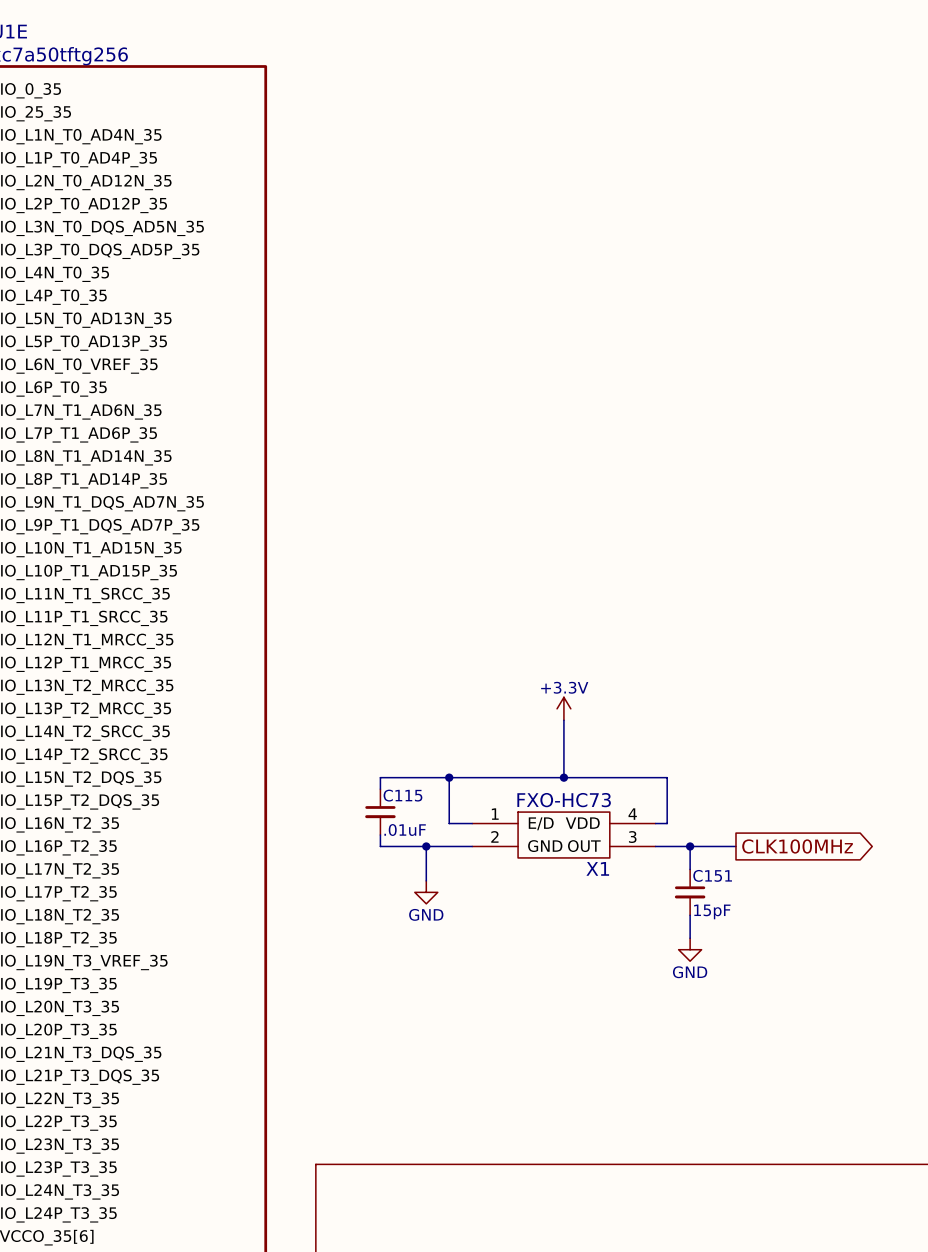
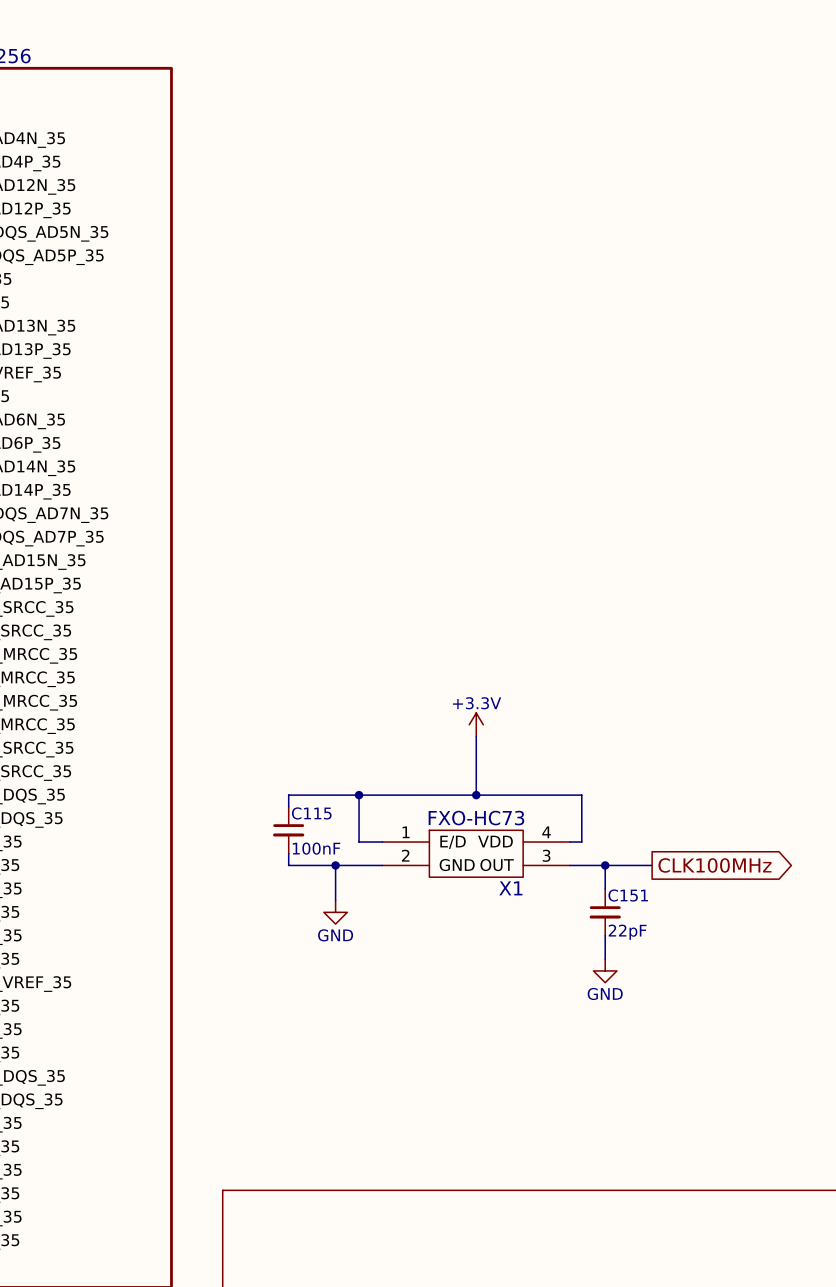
C115 value: .01uF (405, 830) -> 100nF (316, 848)
C151 value: 15pF (712, 911) -> 22pF (627, 932)

